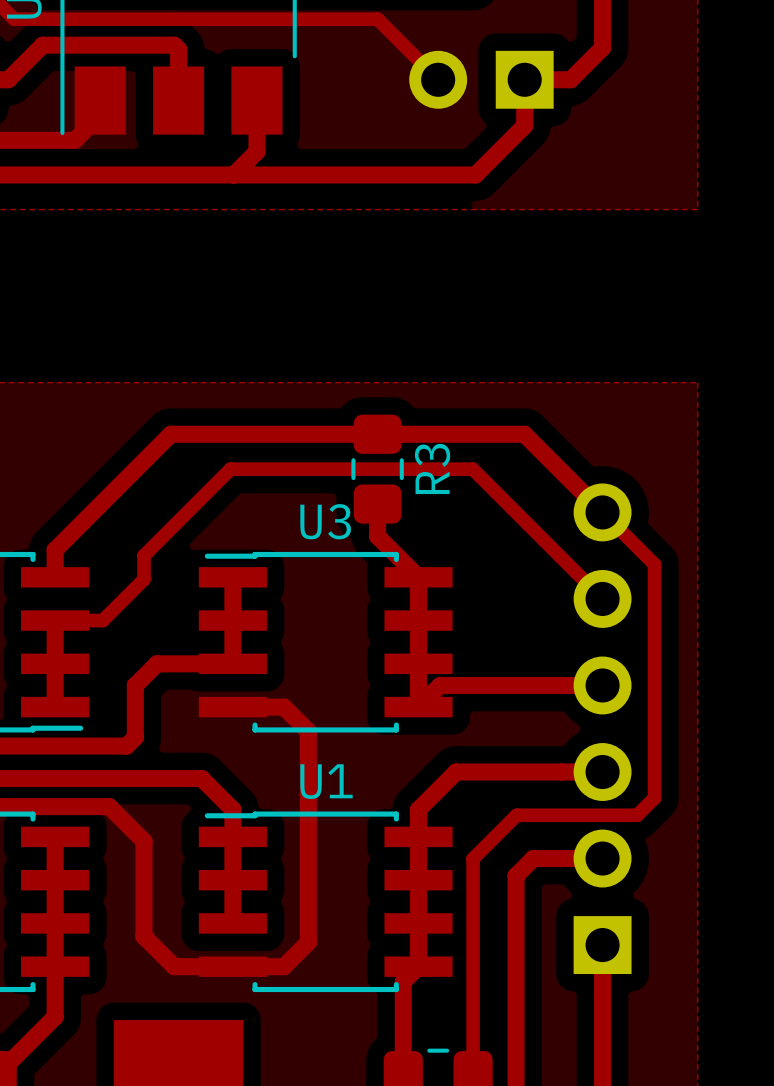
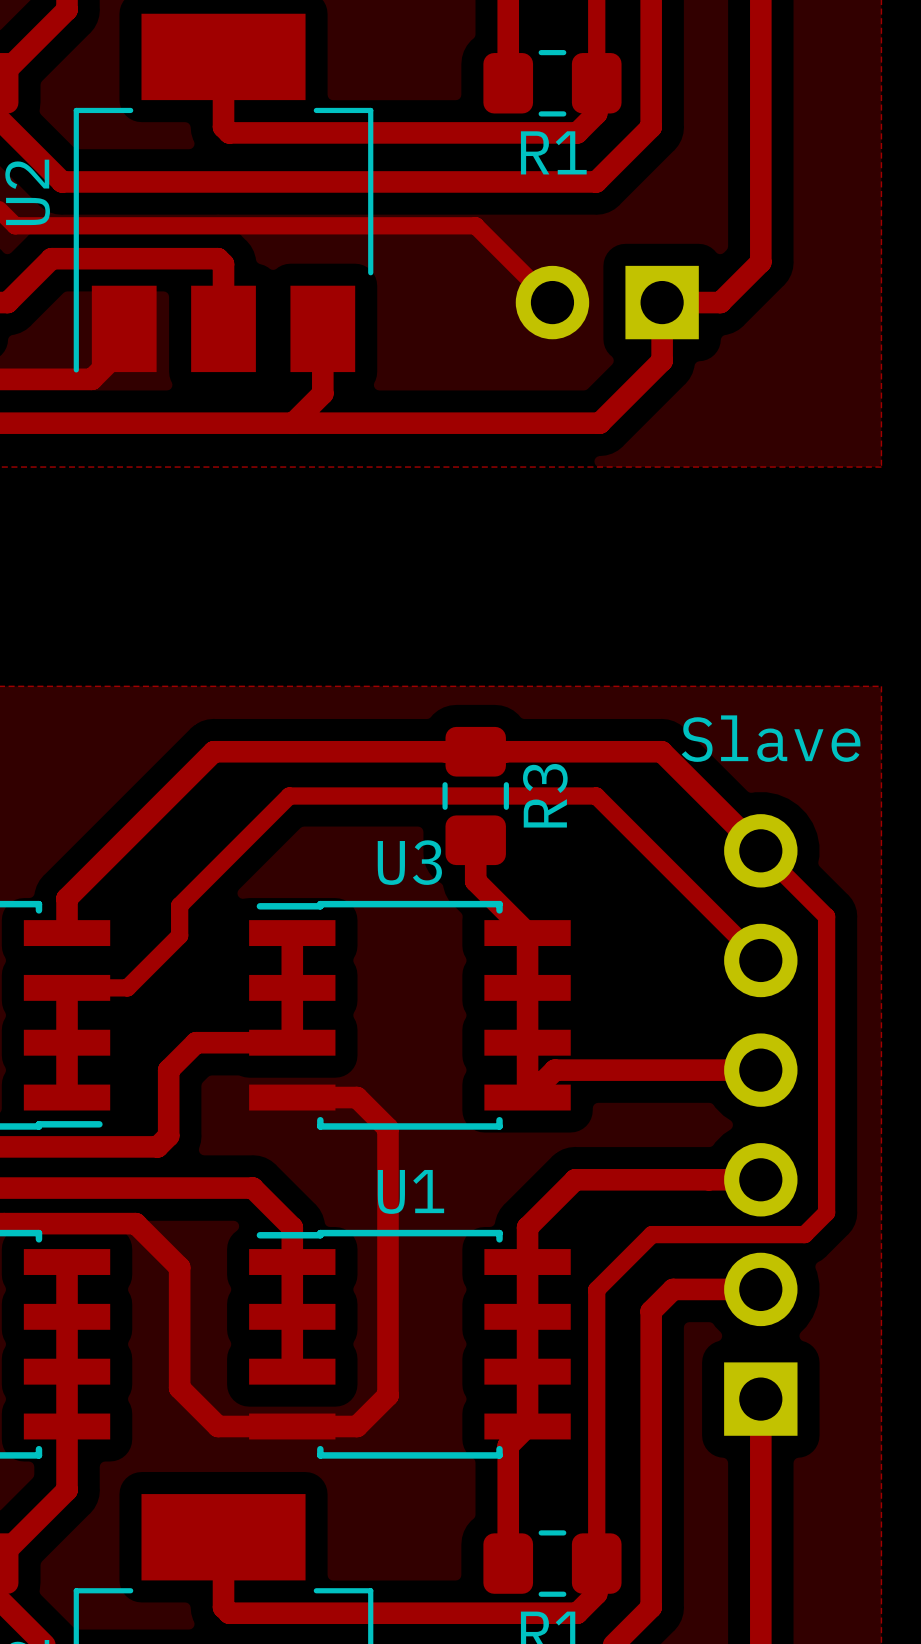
text: none -> Slave (771, 738)

